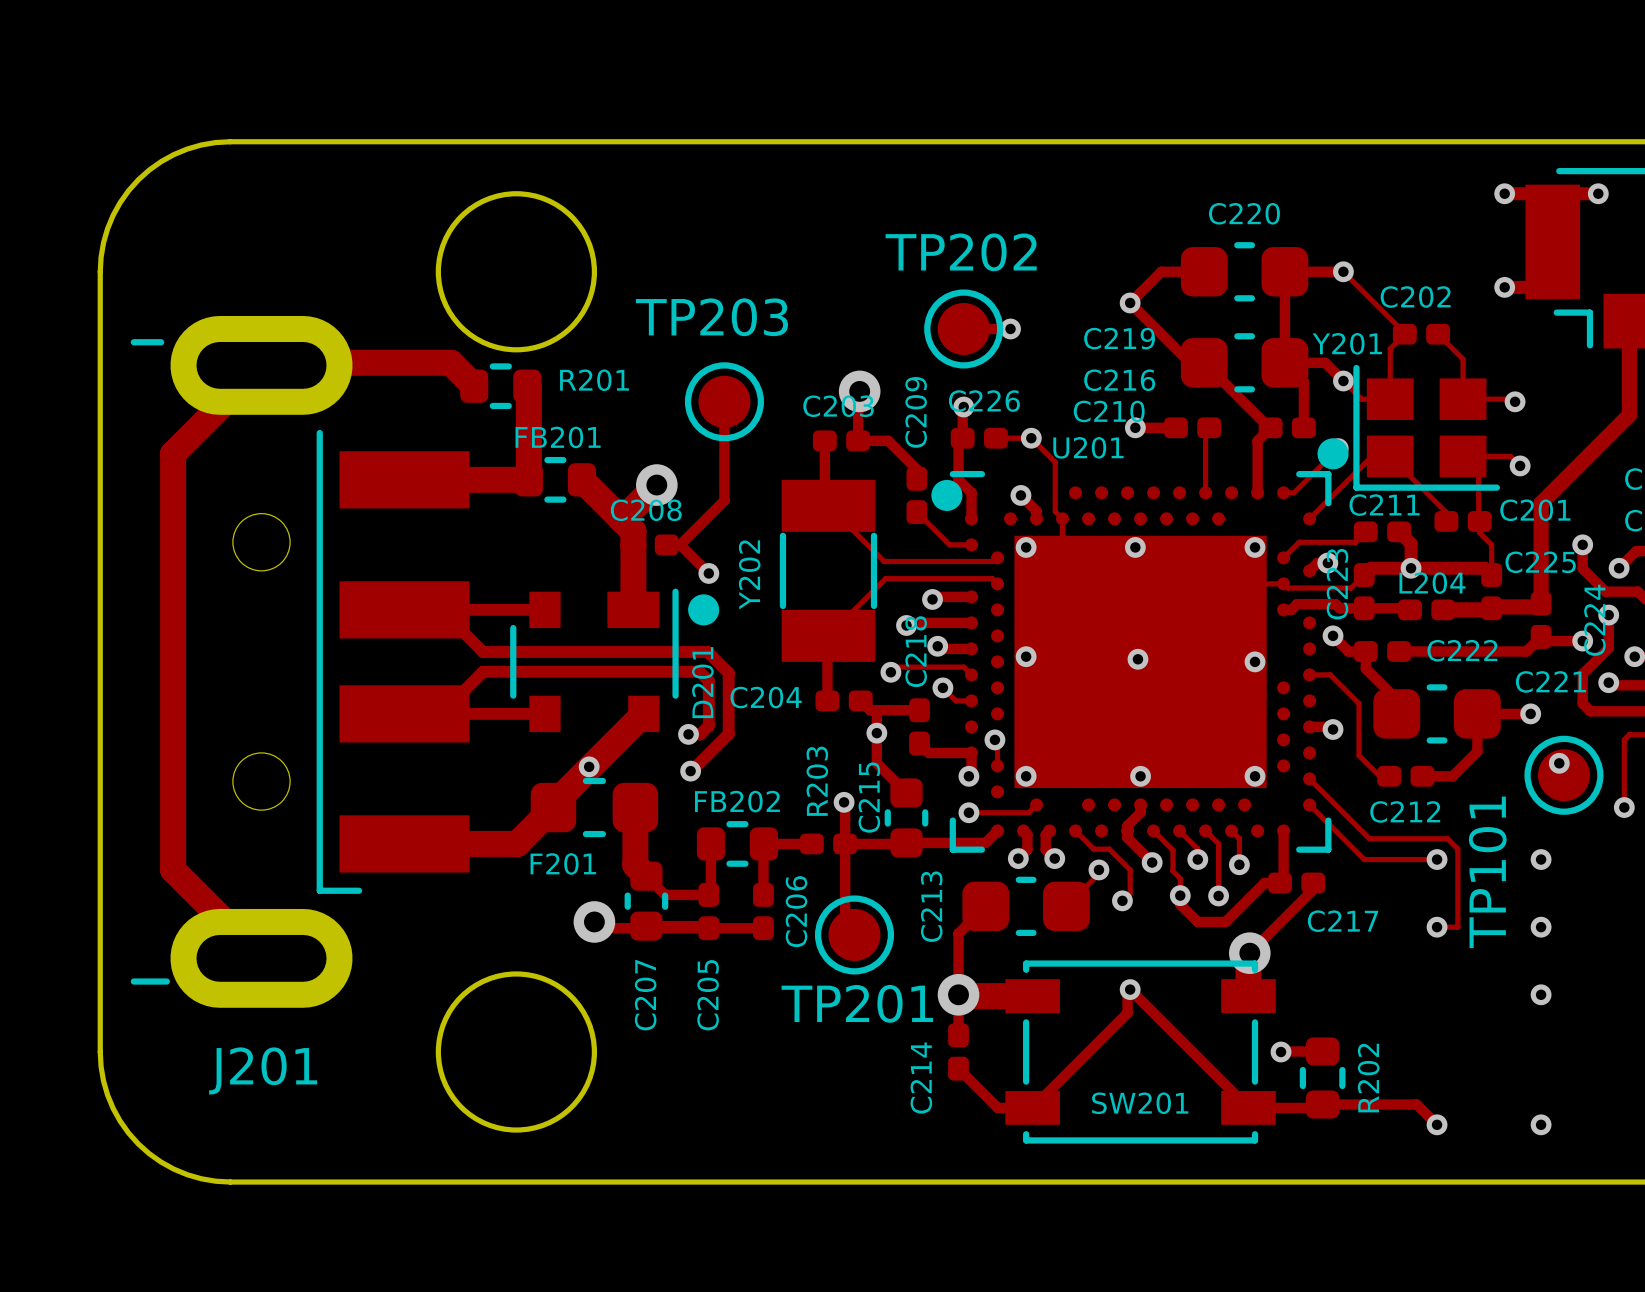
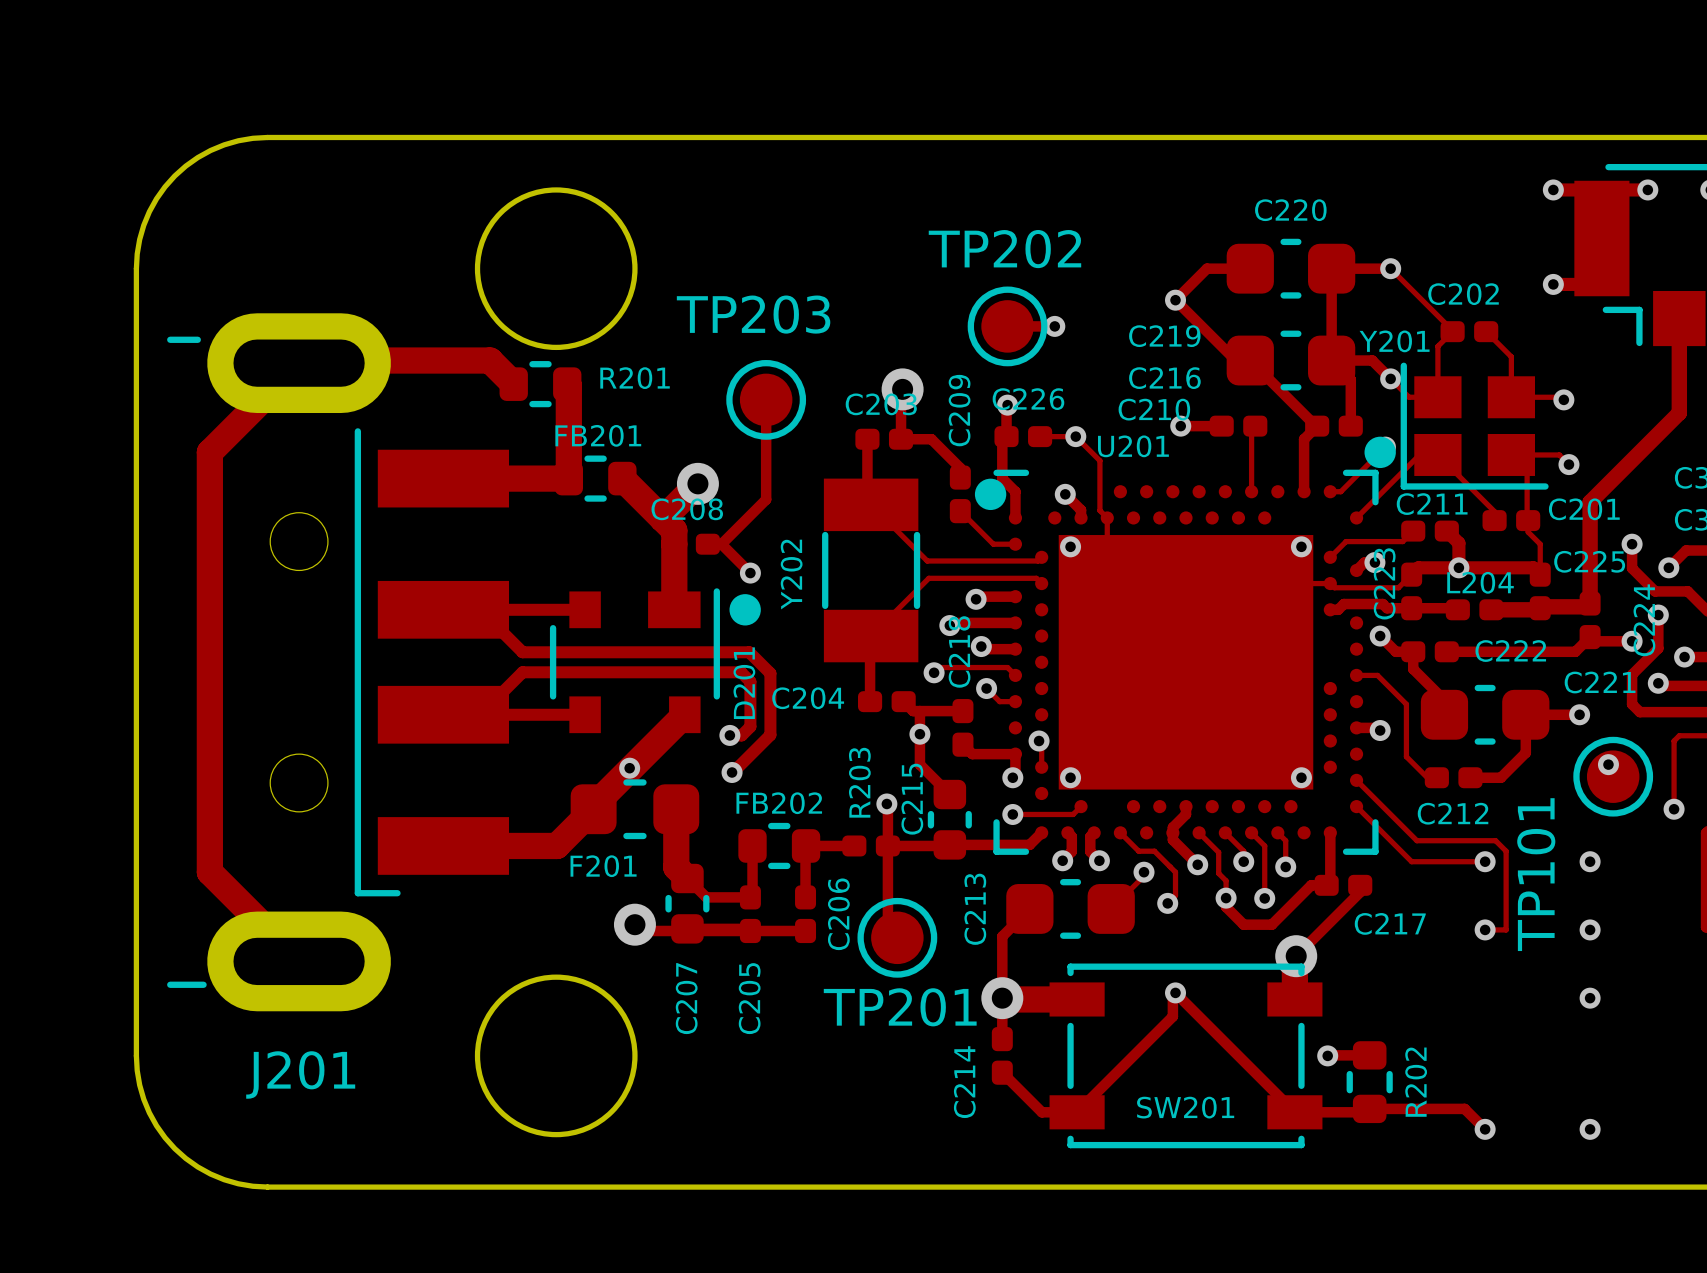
via: (1135, 547) -> none
via: (1026, 656) -> none
via: (1137, 659) -> none
via: (1255, 661) -> none
via: (1140, 776) -> none

